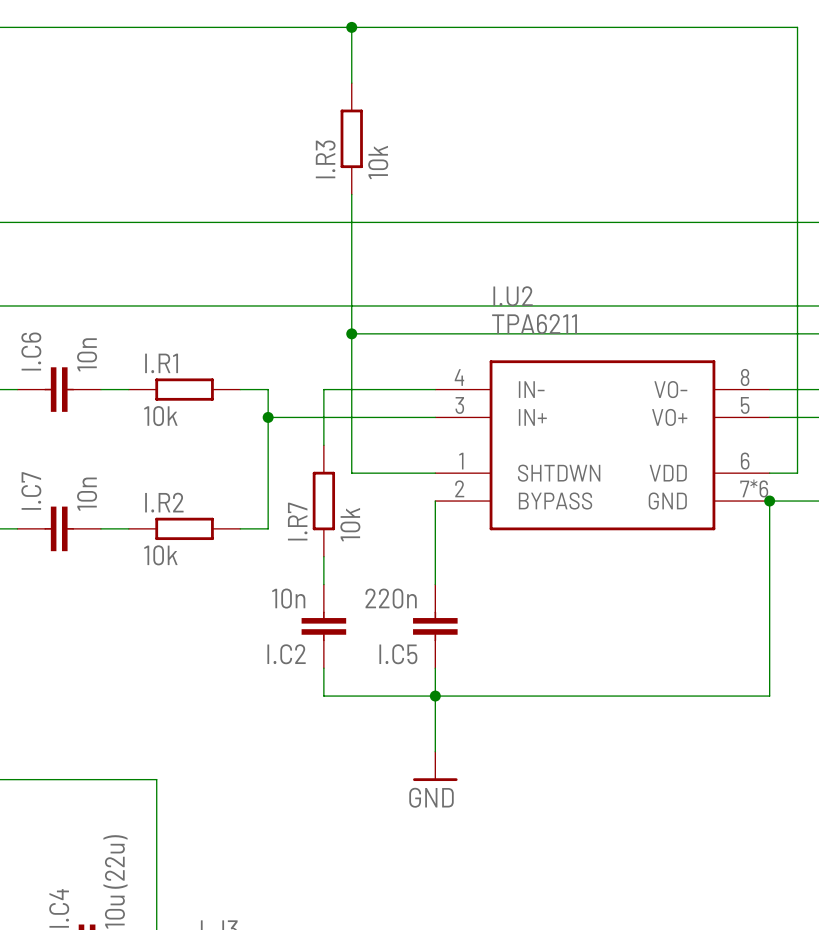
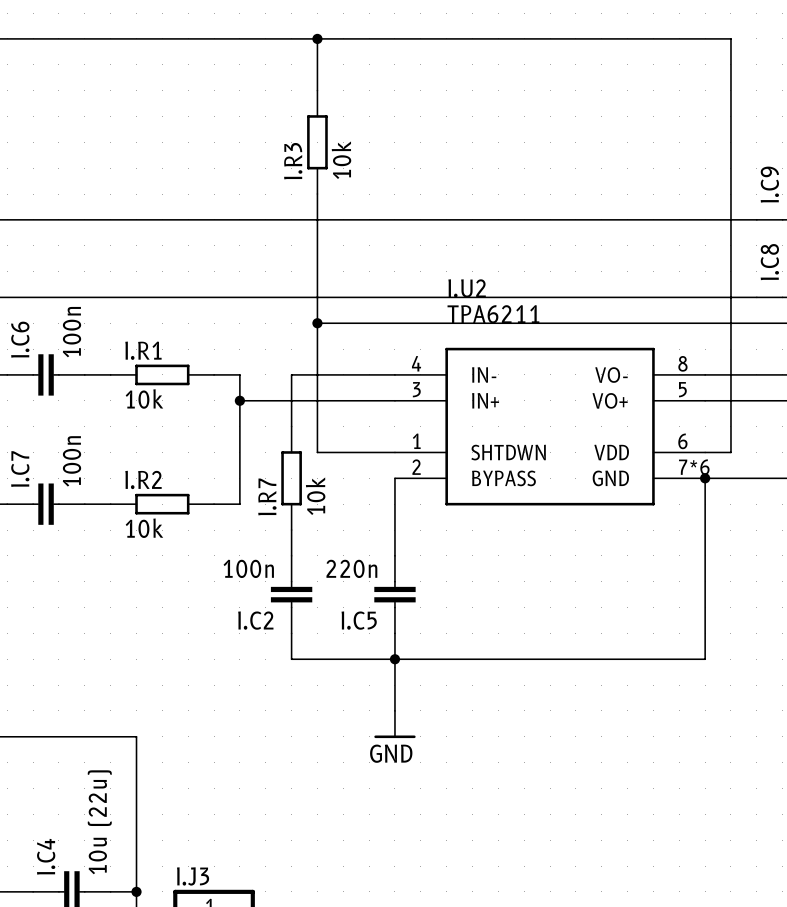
I.C6 value: 10n (87, 354) -> 100n (71, 332)
I.C7 value: 10n (87, 494) -> 100n (71, 461)
I.C2 value: 10n (288, 598) -> 100n (248, 568)

